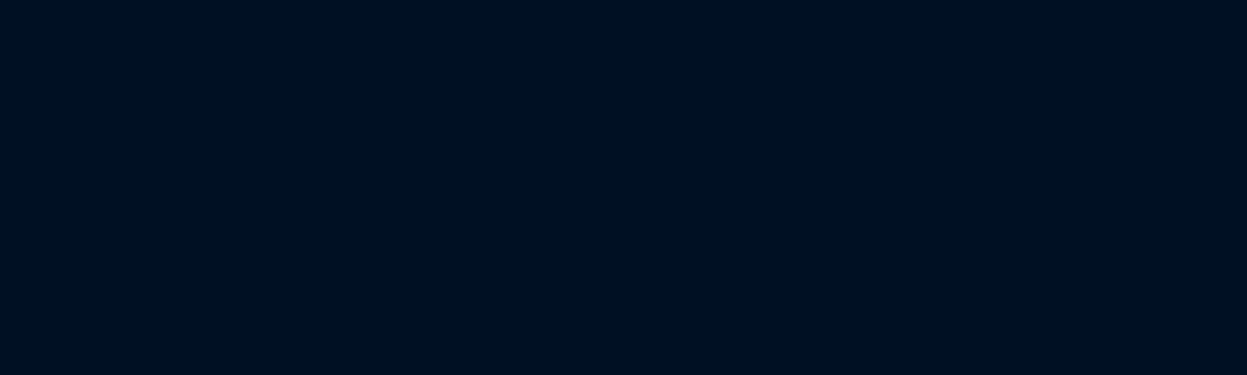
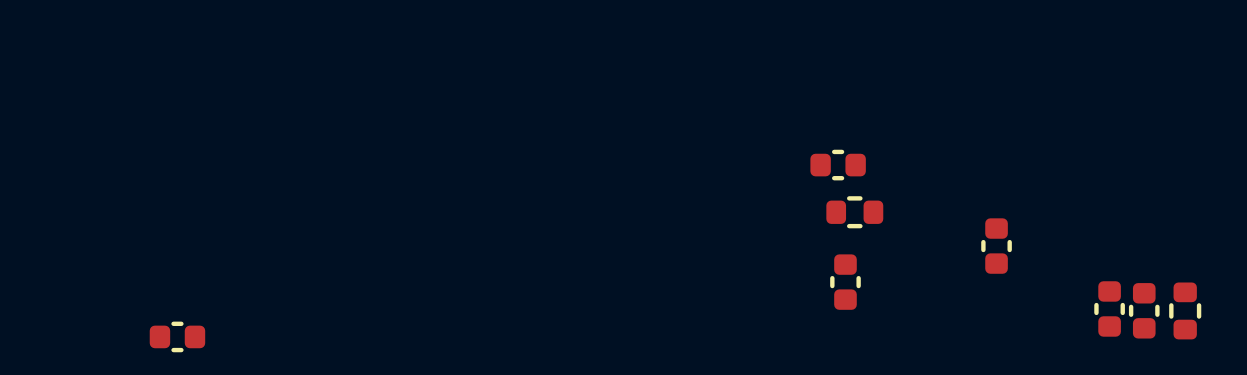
part: none -> (838, 165)
part: none -> (854, 212)
part: none -> (996, 246)
part: none -> (845, 282)
part: none -> (1109, 308)
part: none -> (1144, 310)
part: none -> (1185, 310)
part: none -> (177, 336)

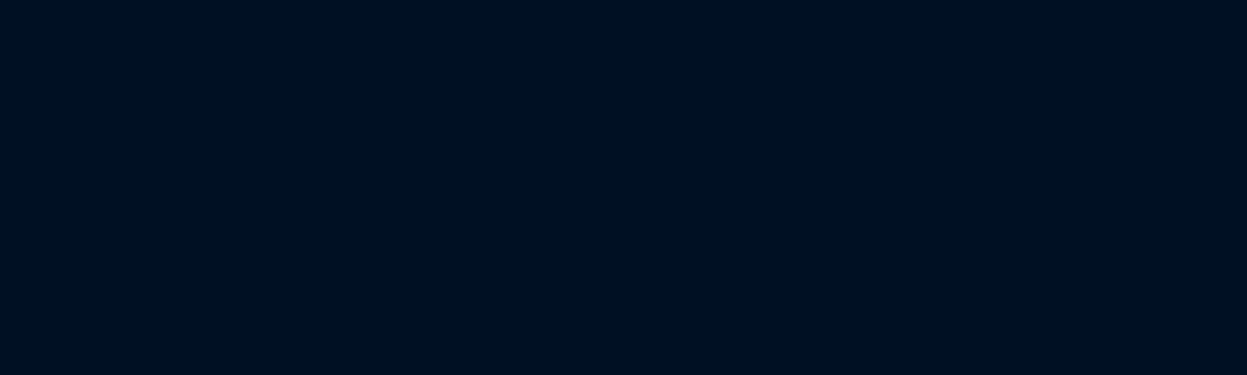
part: (838, 165) -> none
part: (854, 212) -> none
part: (996, 246) -> none
part: (845, 282) -> none
part: (1109, 308) -> none
part: (1144, 310) -> none
part: (1185, 310) -> none
part: (177, 336) -> none

